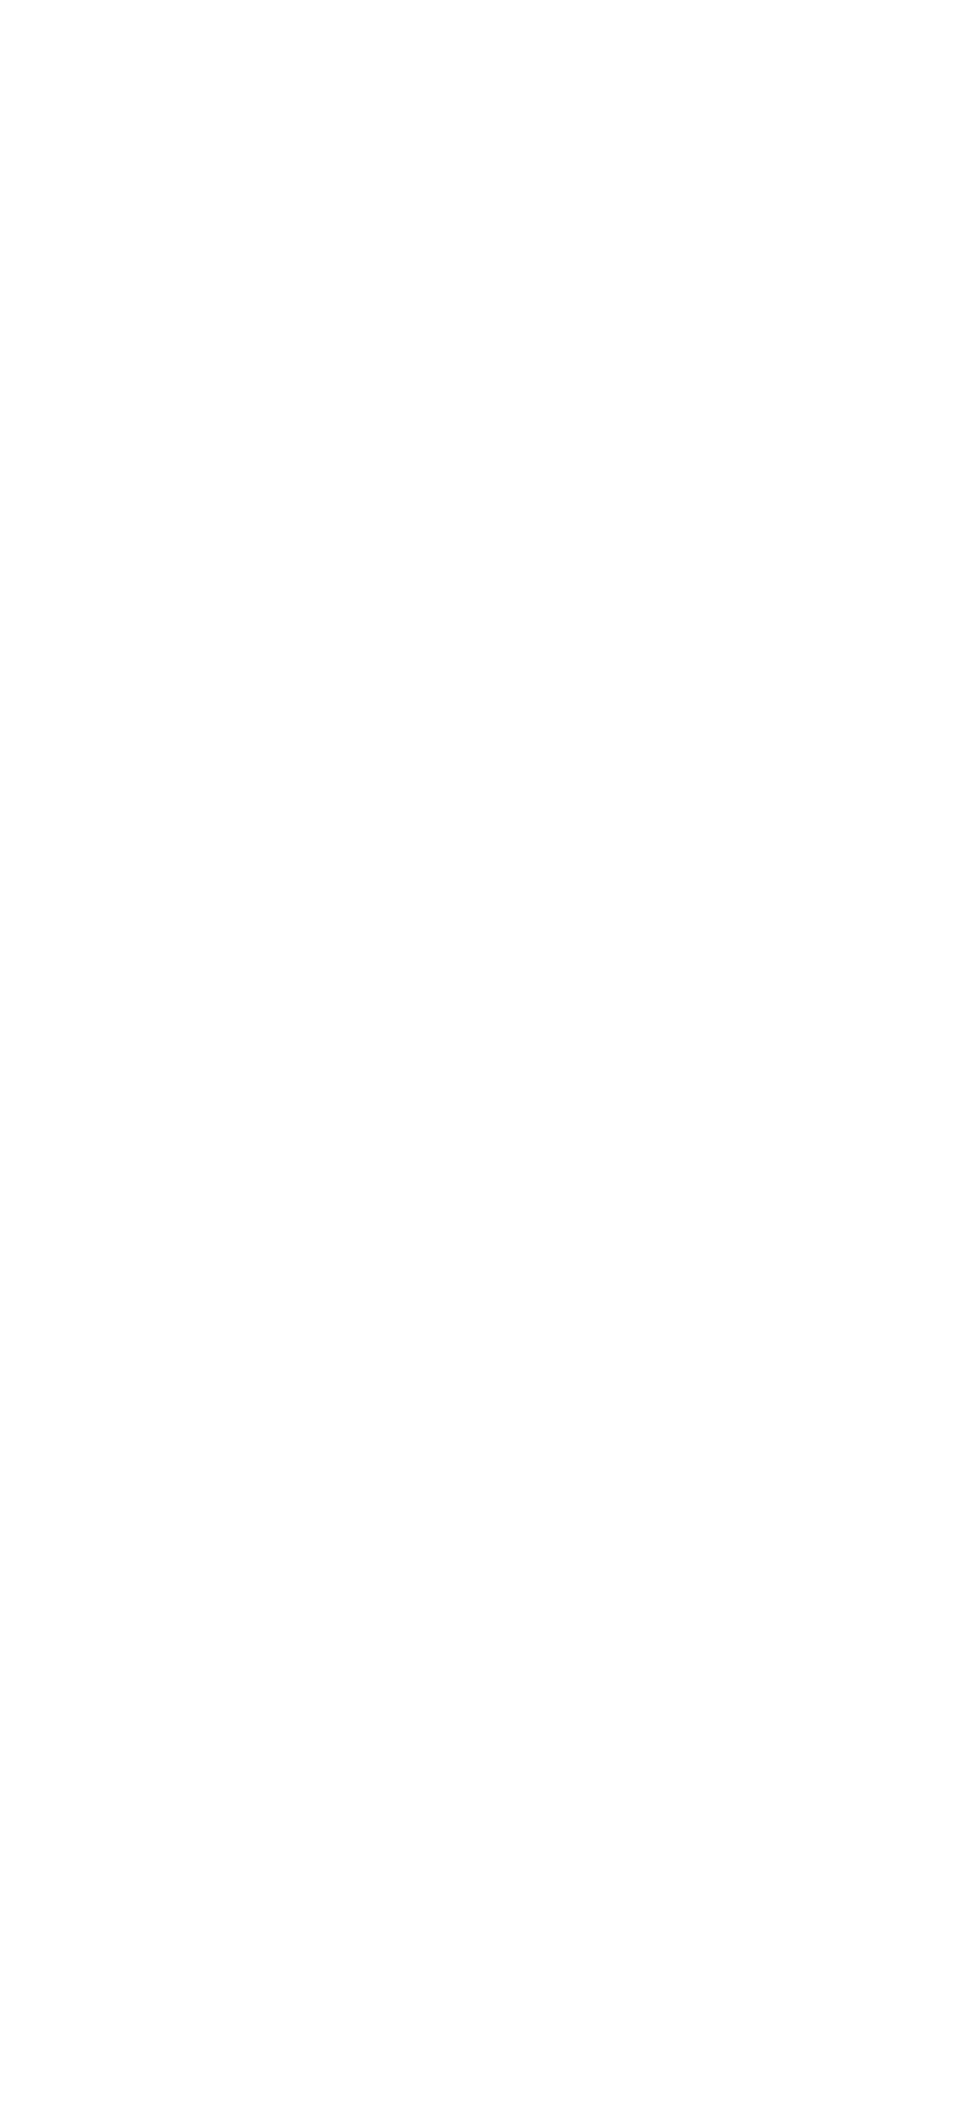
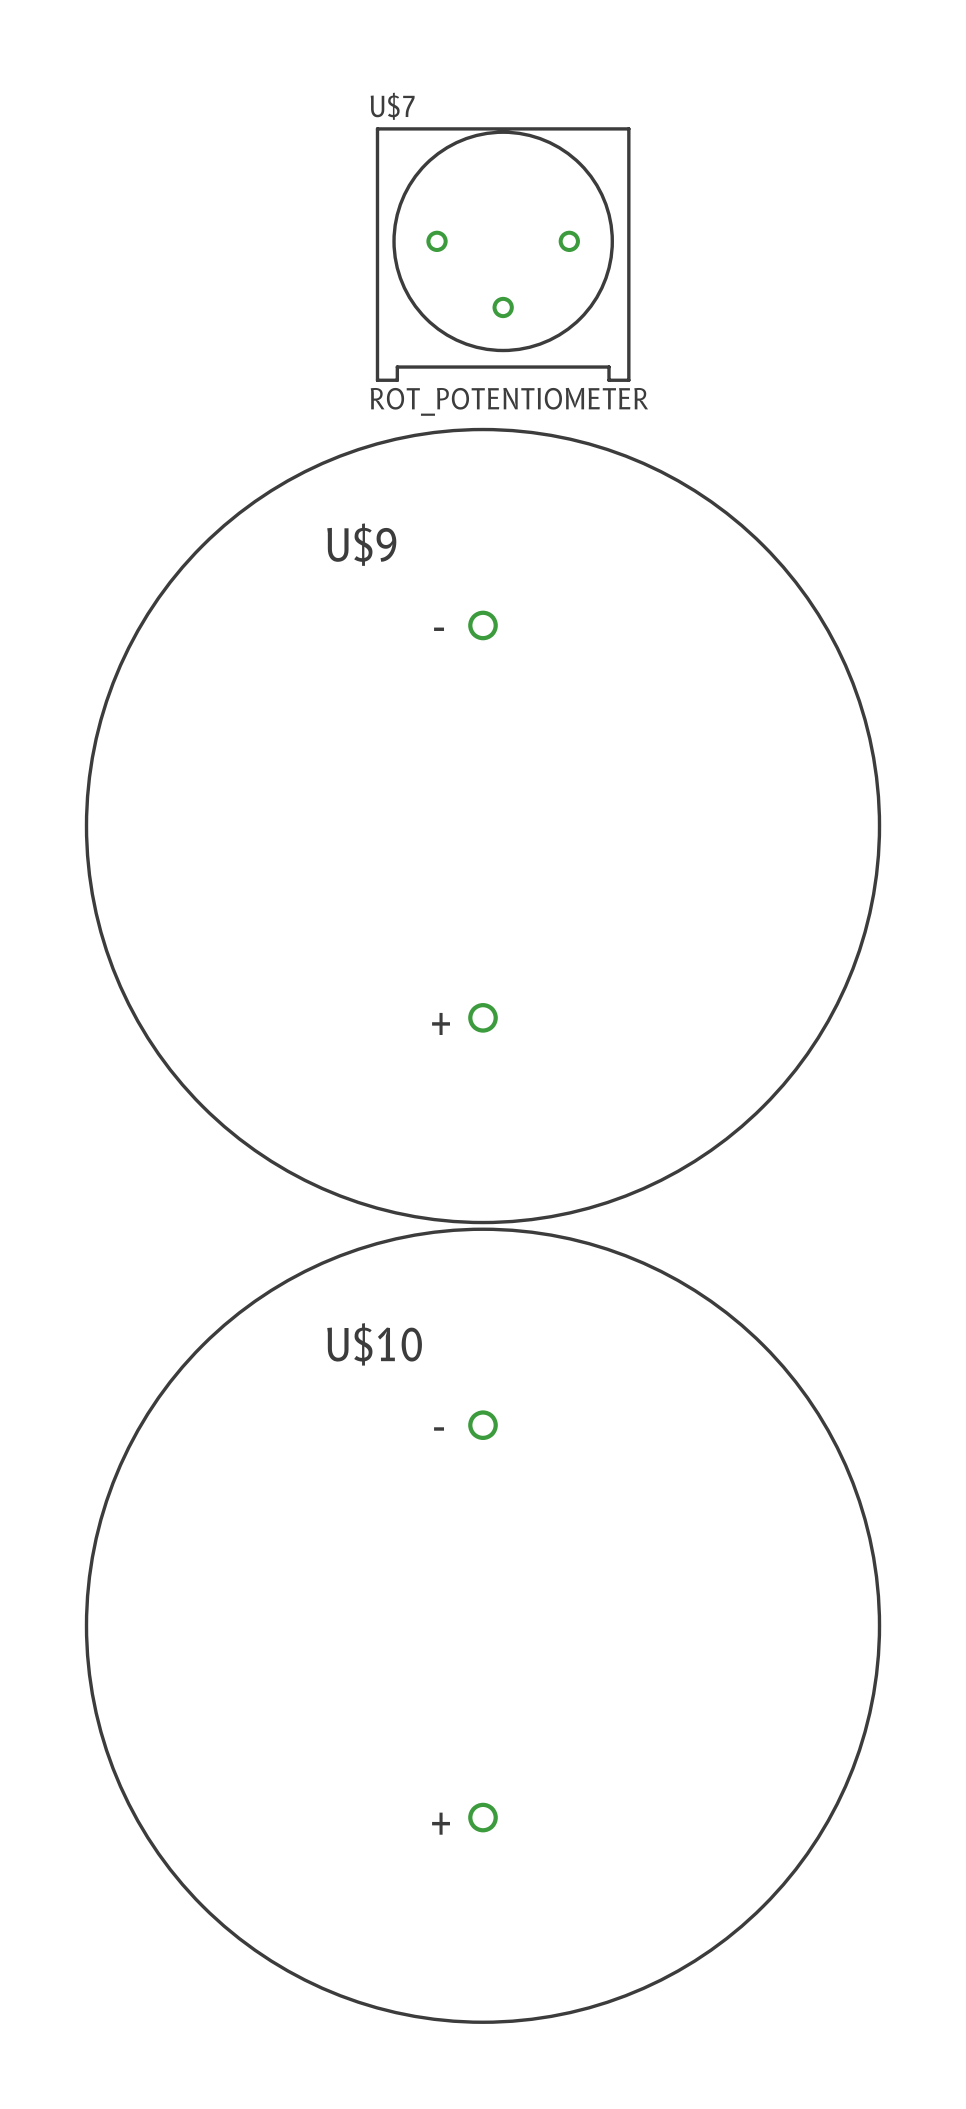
U$7: none -> ROT_POTENTIOMETER (503, 254)
U$9: none -> (483, 826)
U$10: none -> (483, 1625)

